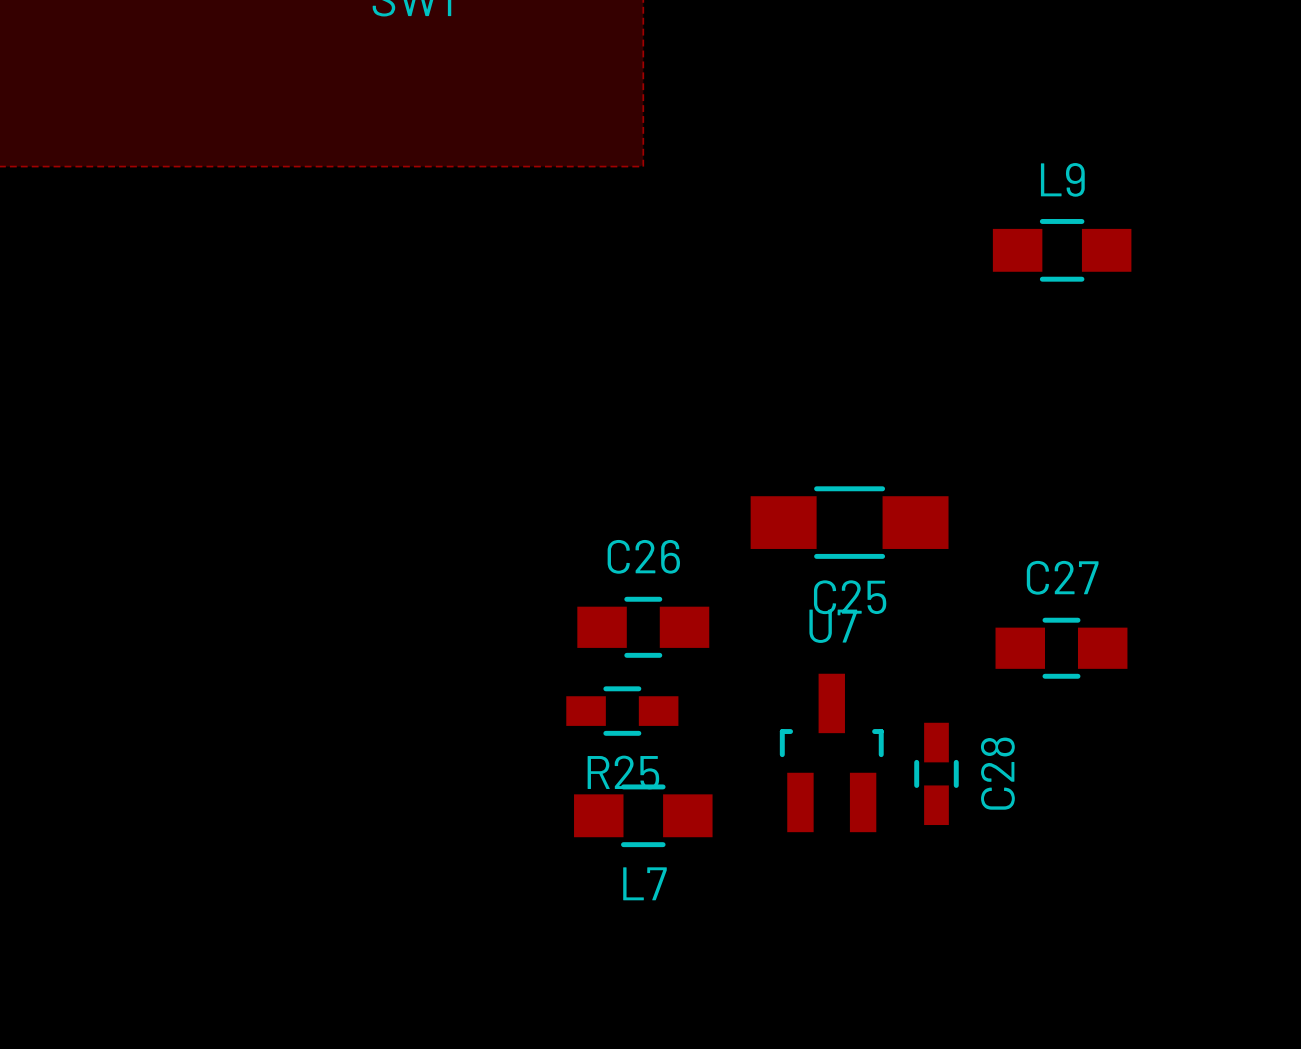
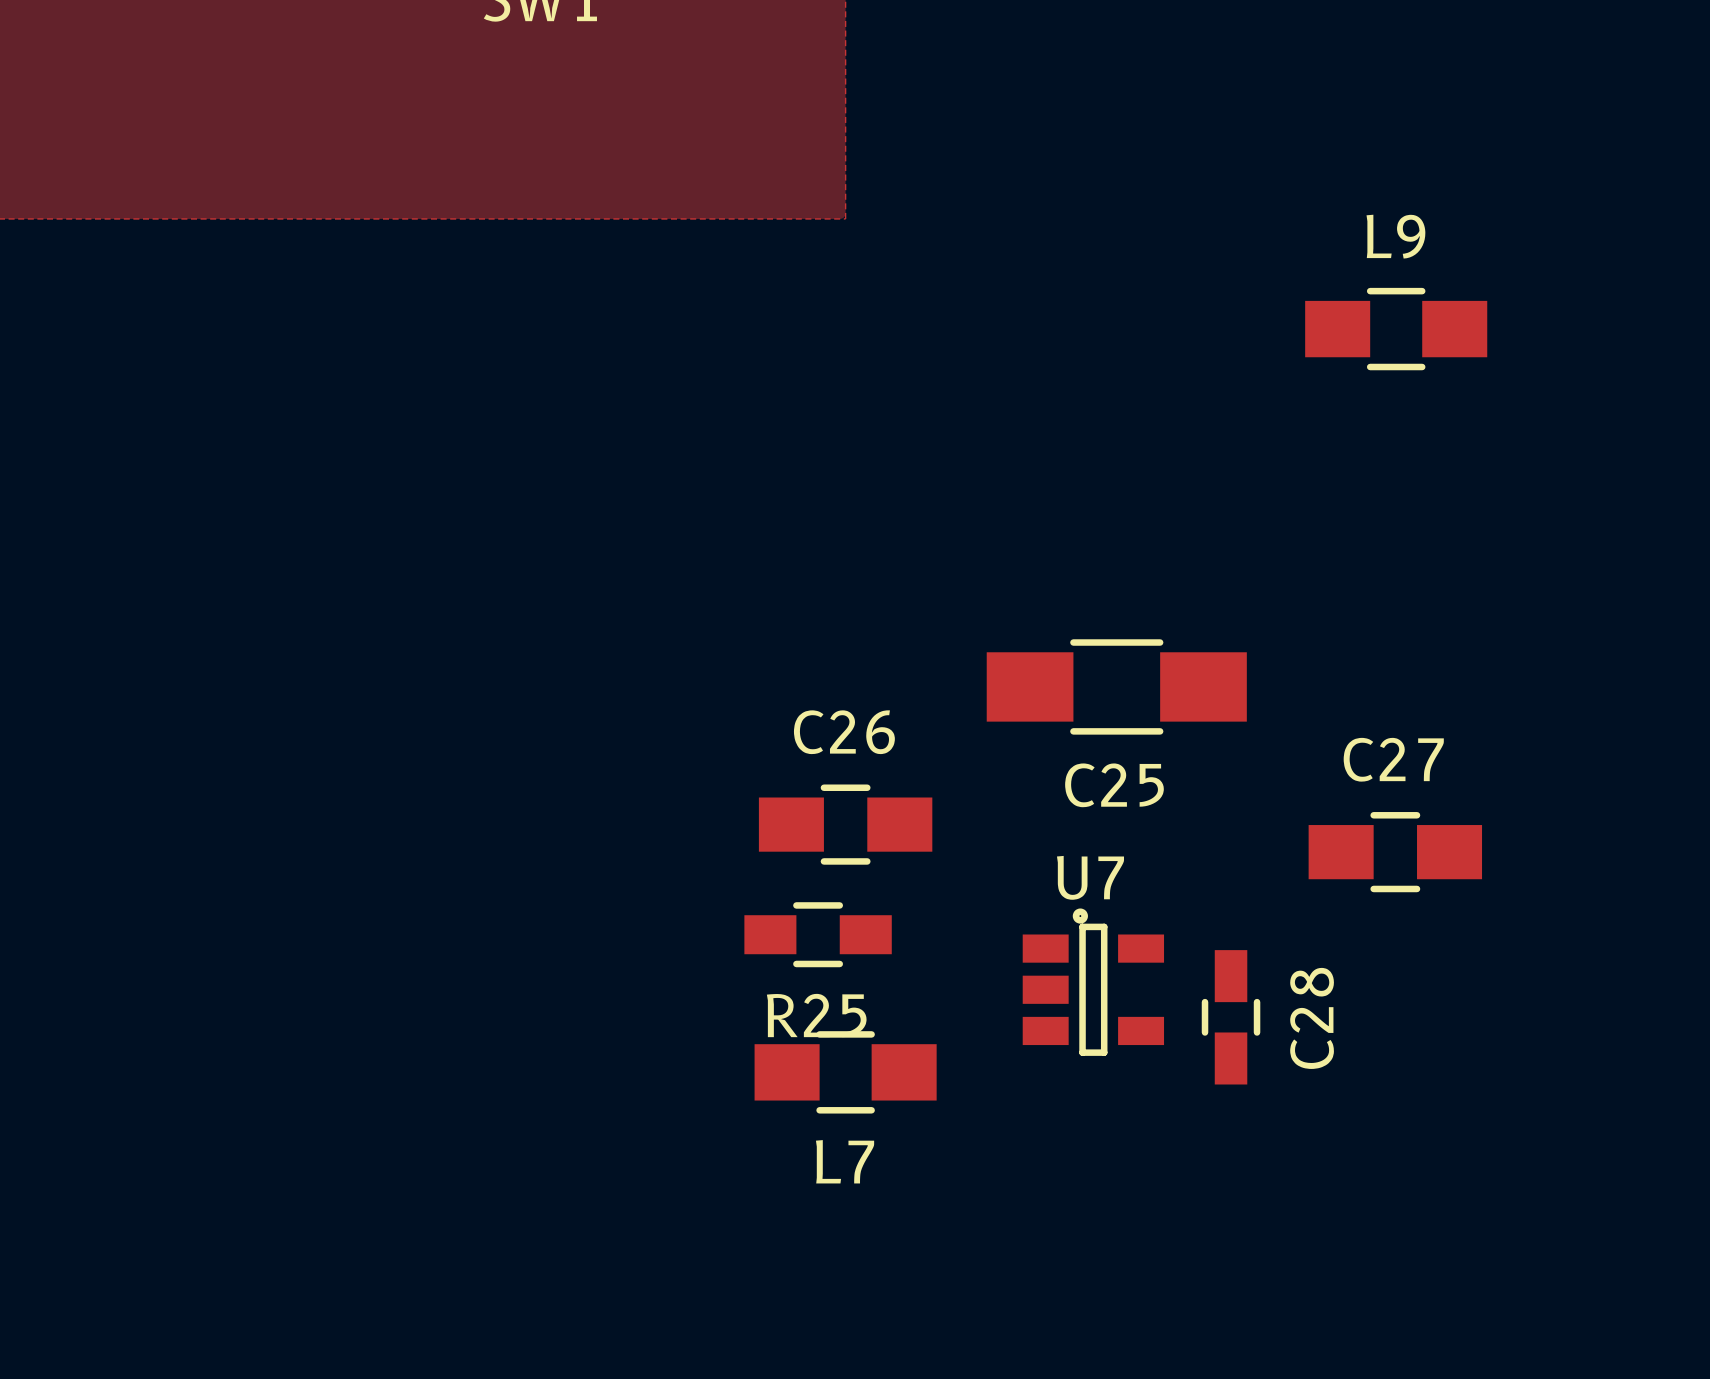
U7 footprint: [779, 673, 884, 833] -> [1022, 908, 1165, 1056]

